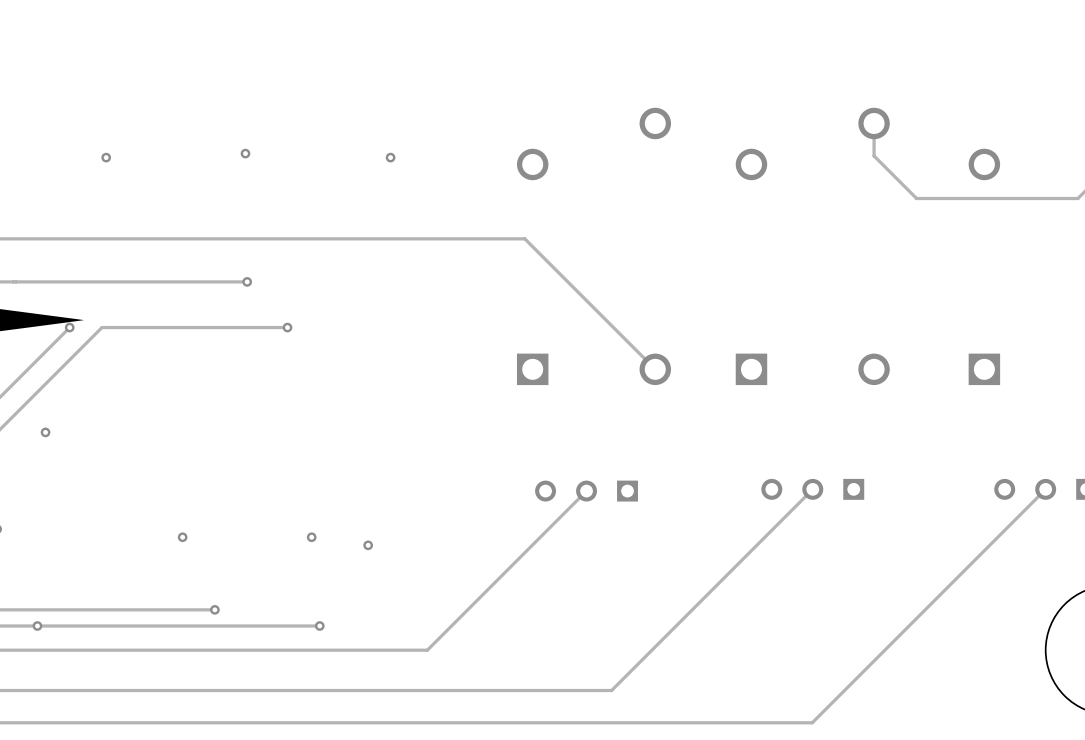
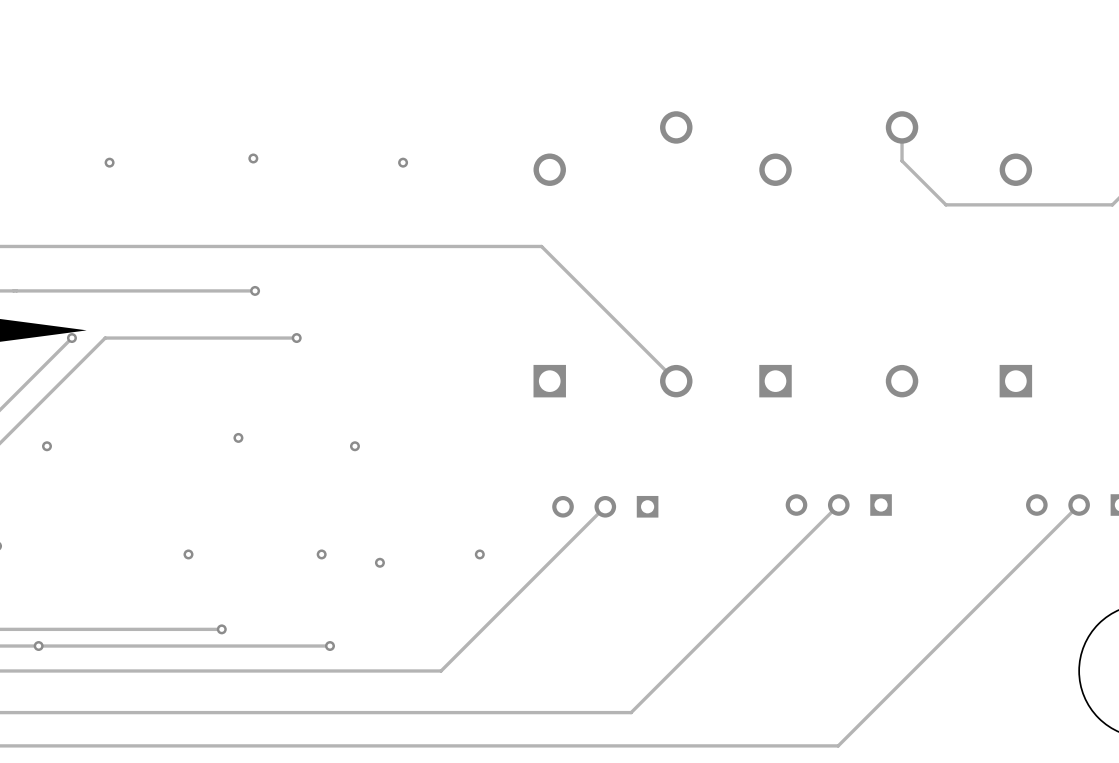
via: none -> (238, 437)
via: none -> (354, 446)
via: none -> (479, 554)

